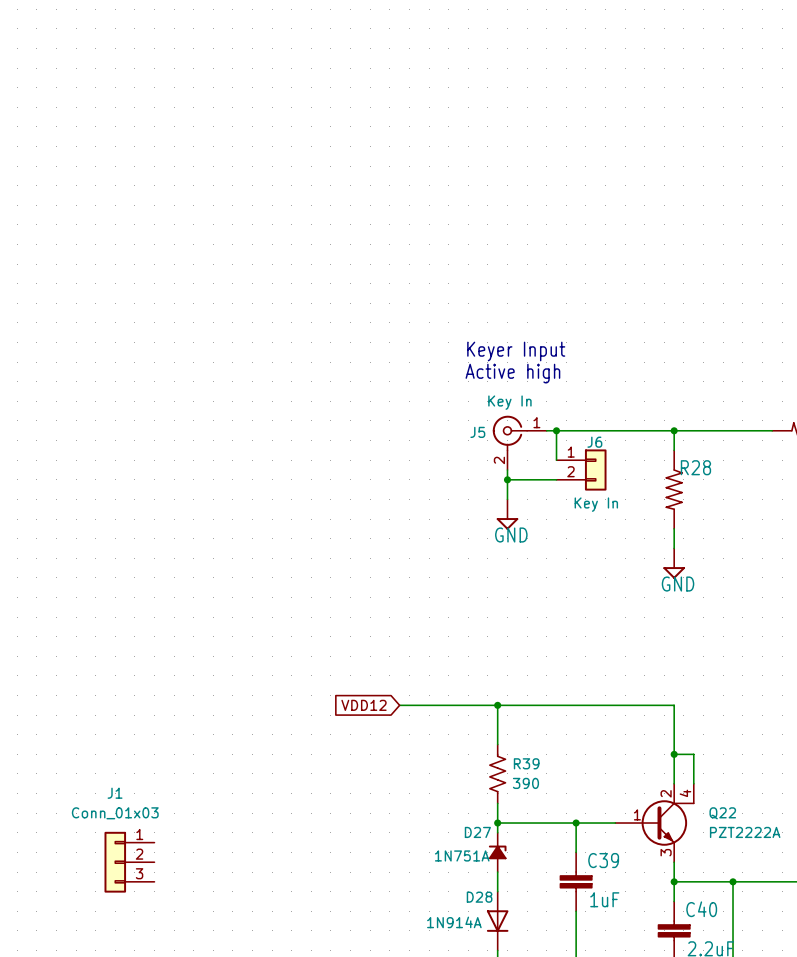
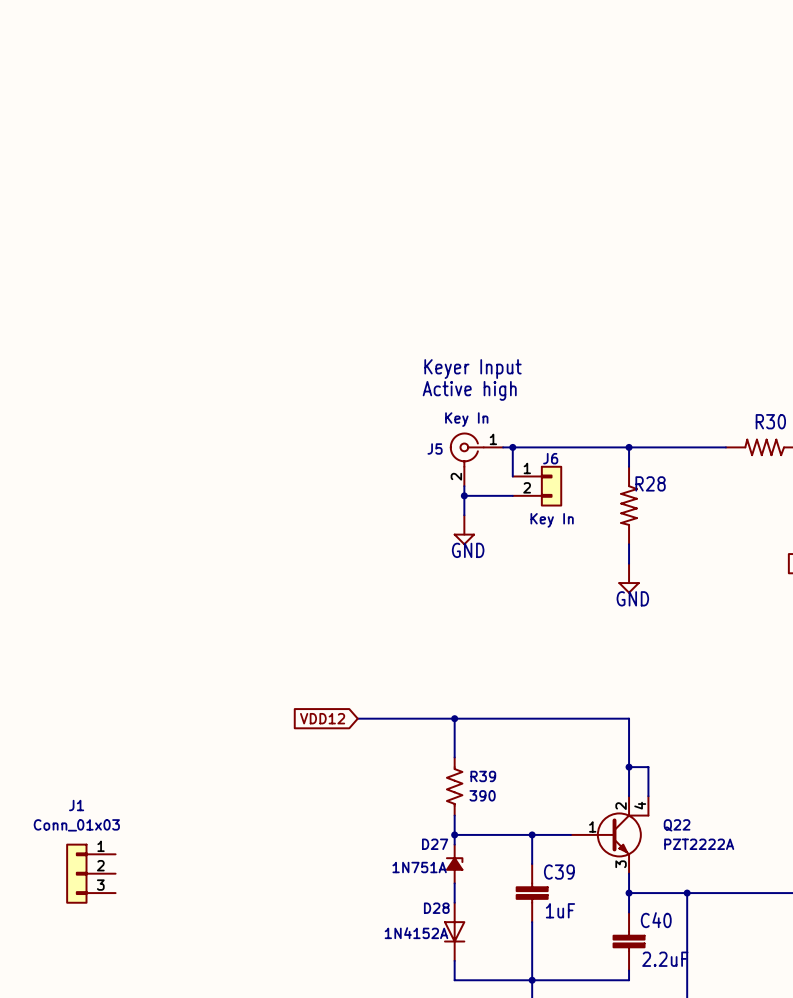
D28 value: 1N914A (454, 922) -> 1N4152A (416, 933)

